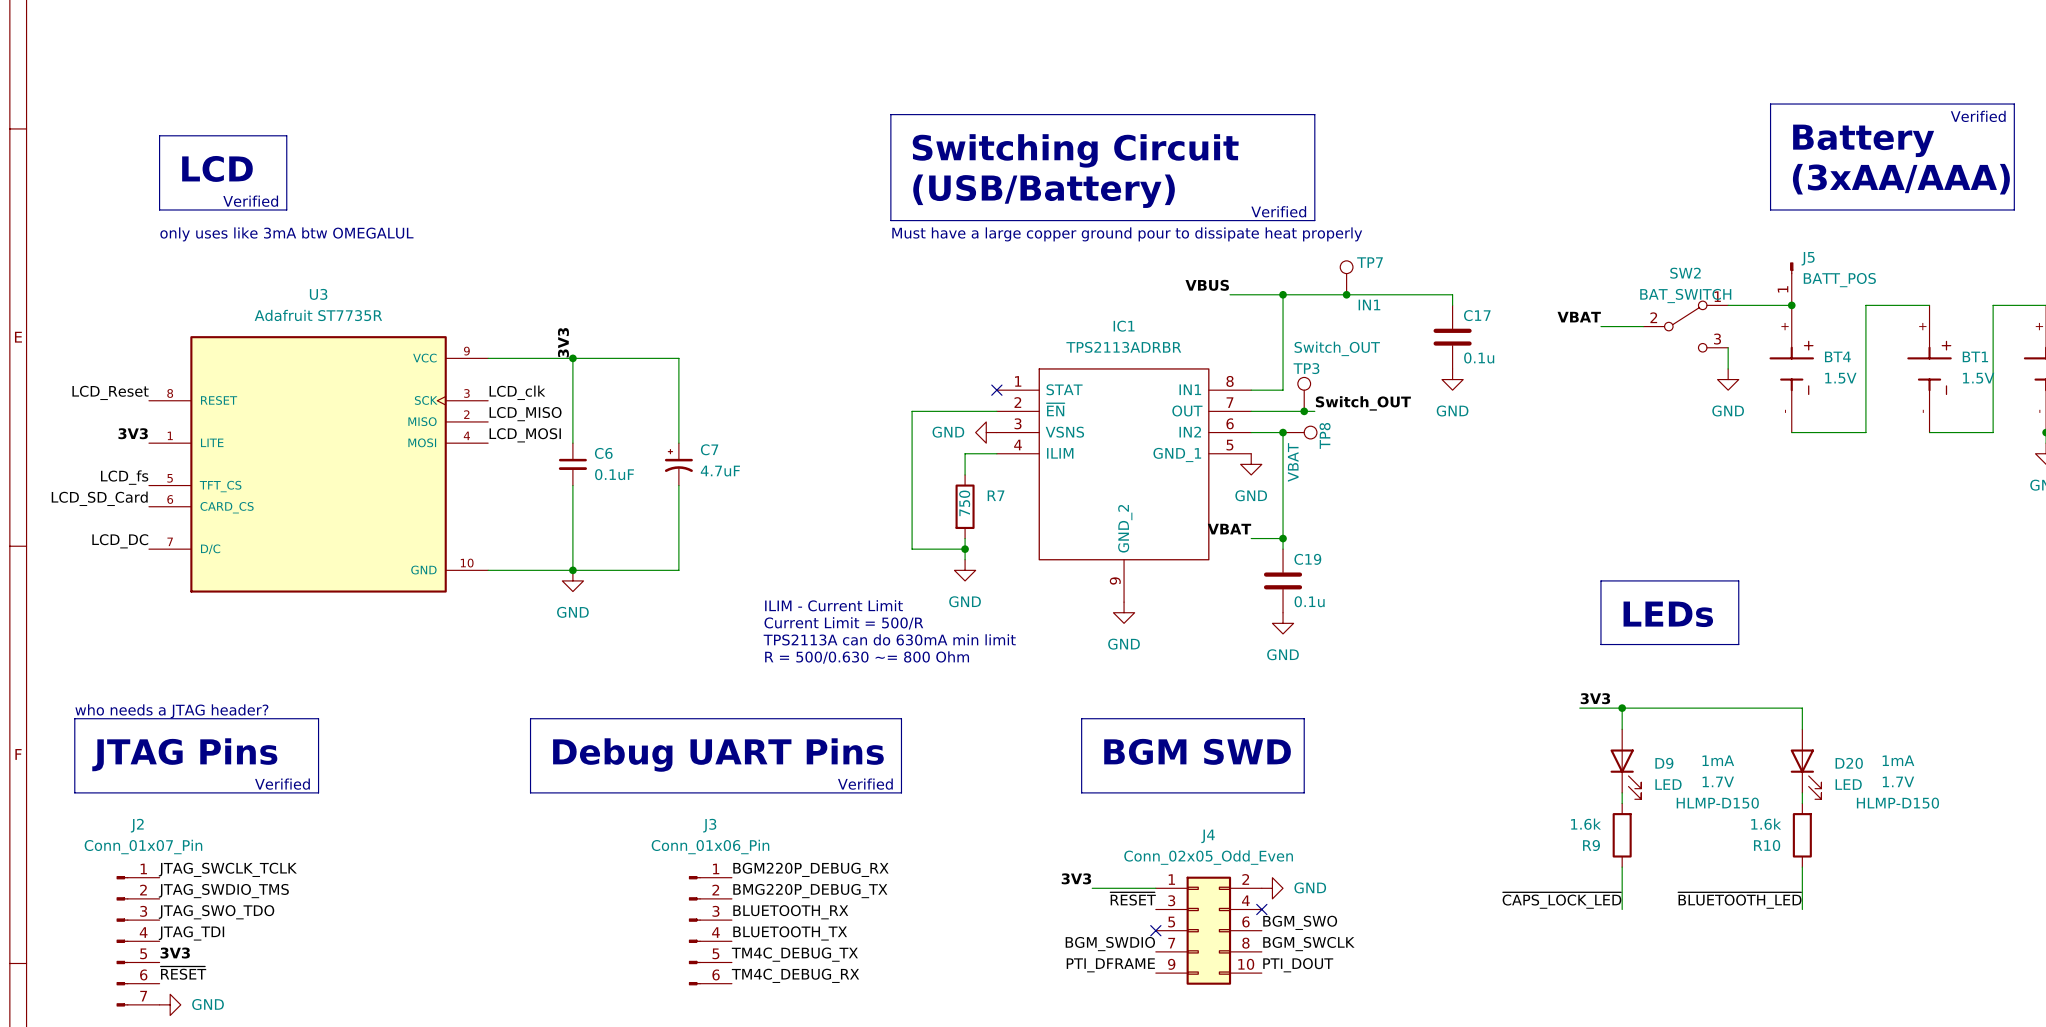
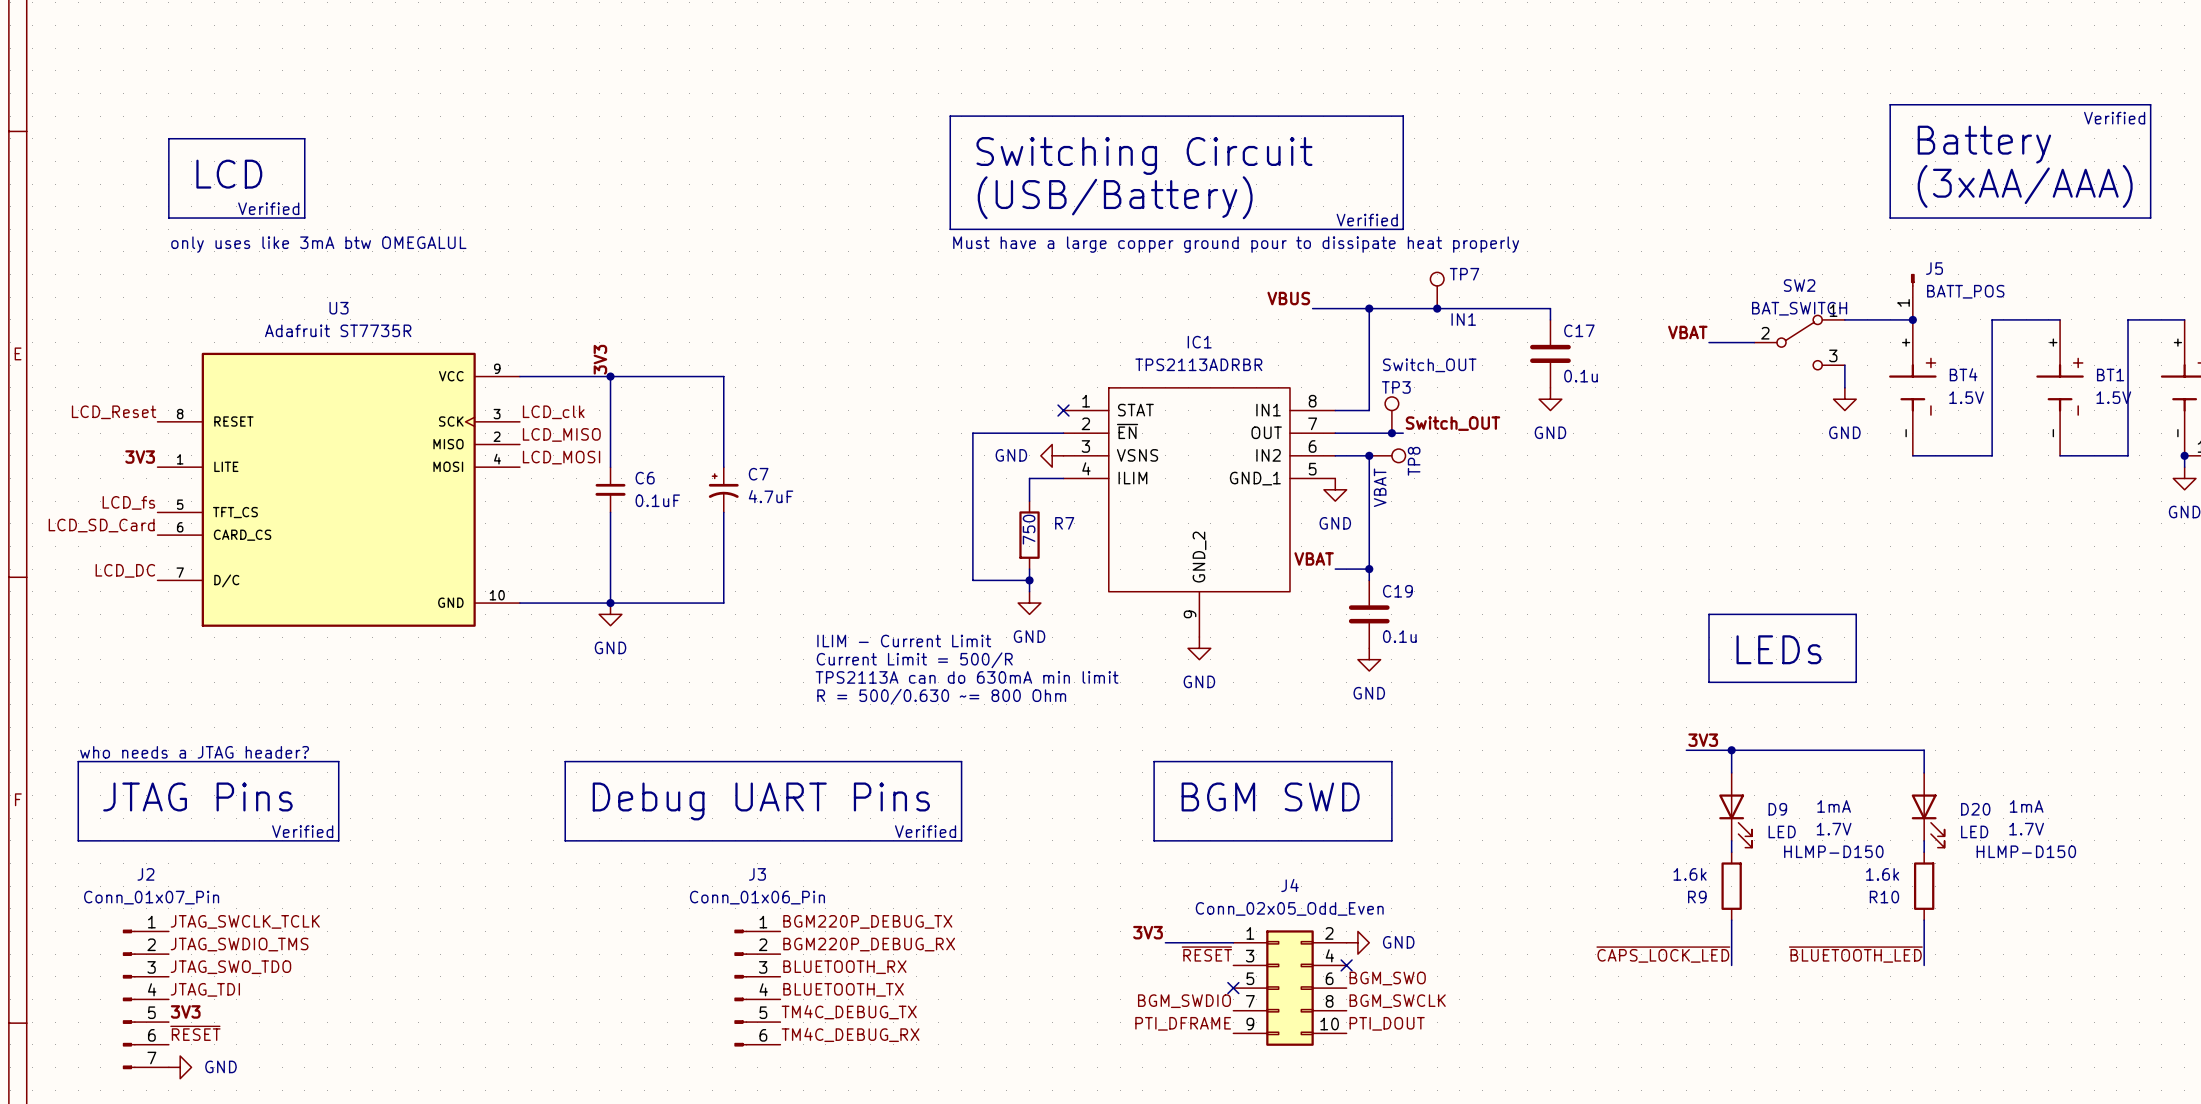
label: BGM220P_DEBUG_RX (810, 869) -> BGM220P_DEBUG_TX (867, 921)
label: BMG220P_DEBUG_TX (810, 891) -> BGM220P_DEBUG_RX (869, 944)

